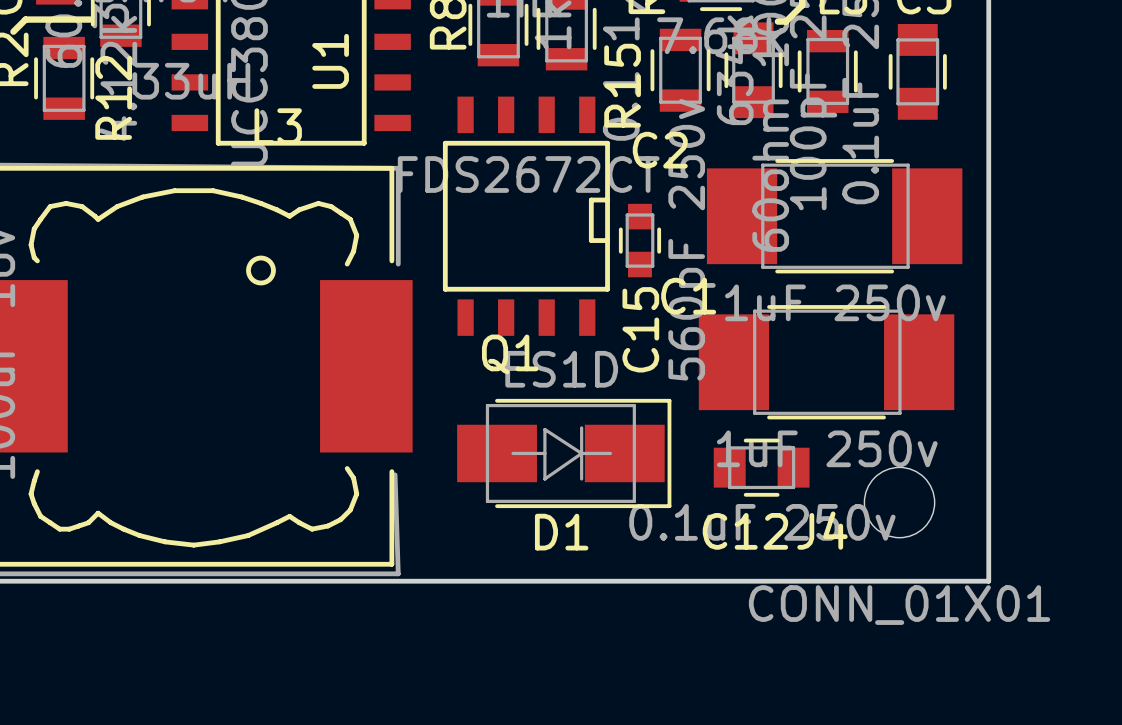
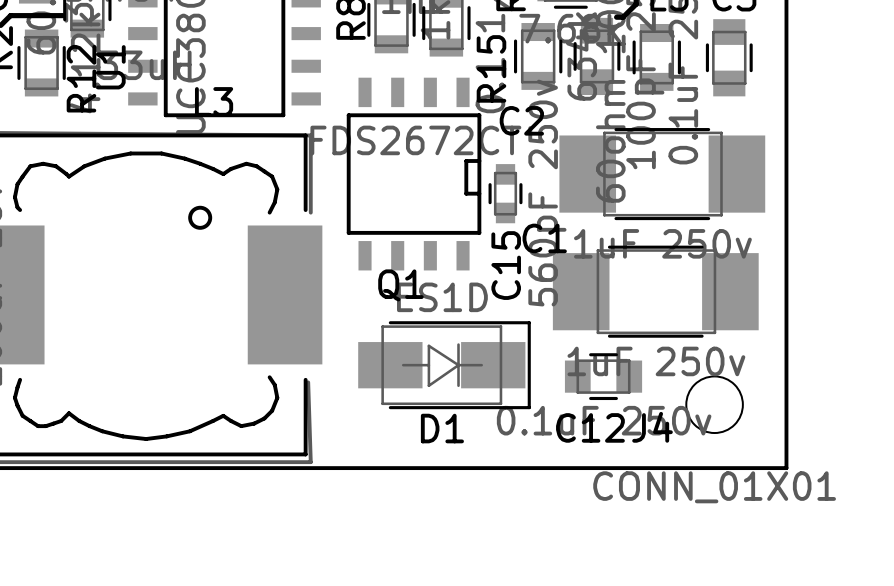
U1 name position: U1 (330, 61) -> U1 (110, 67)

